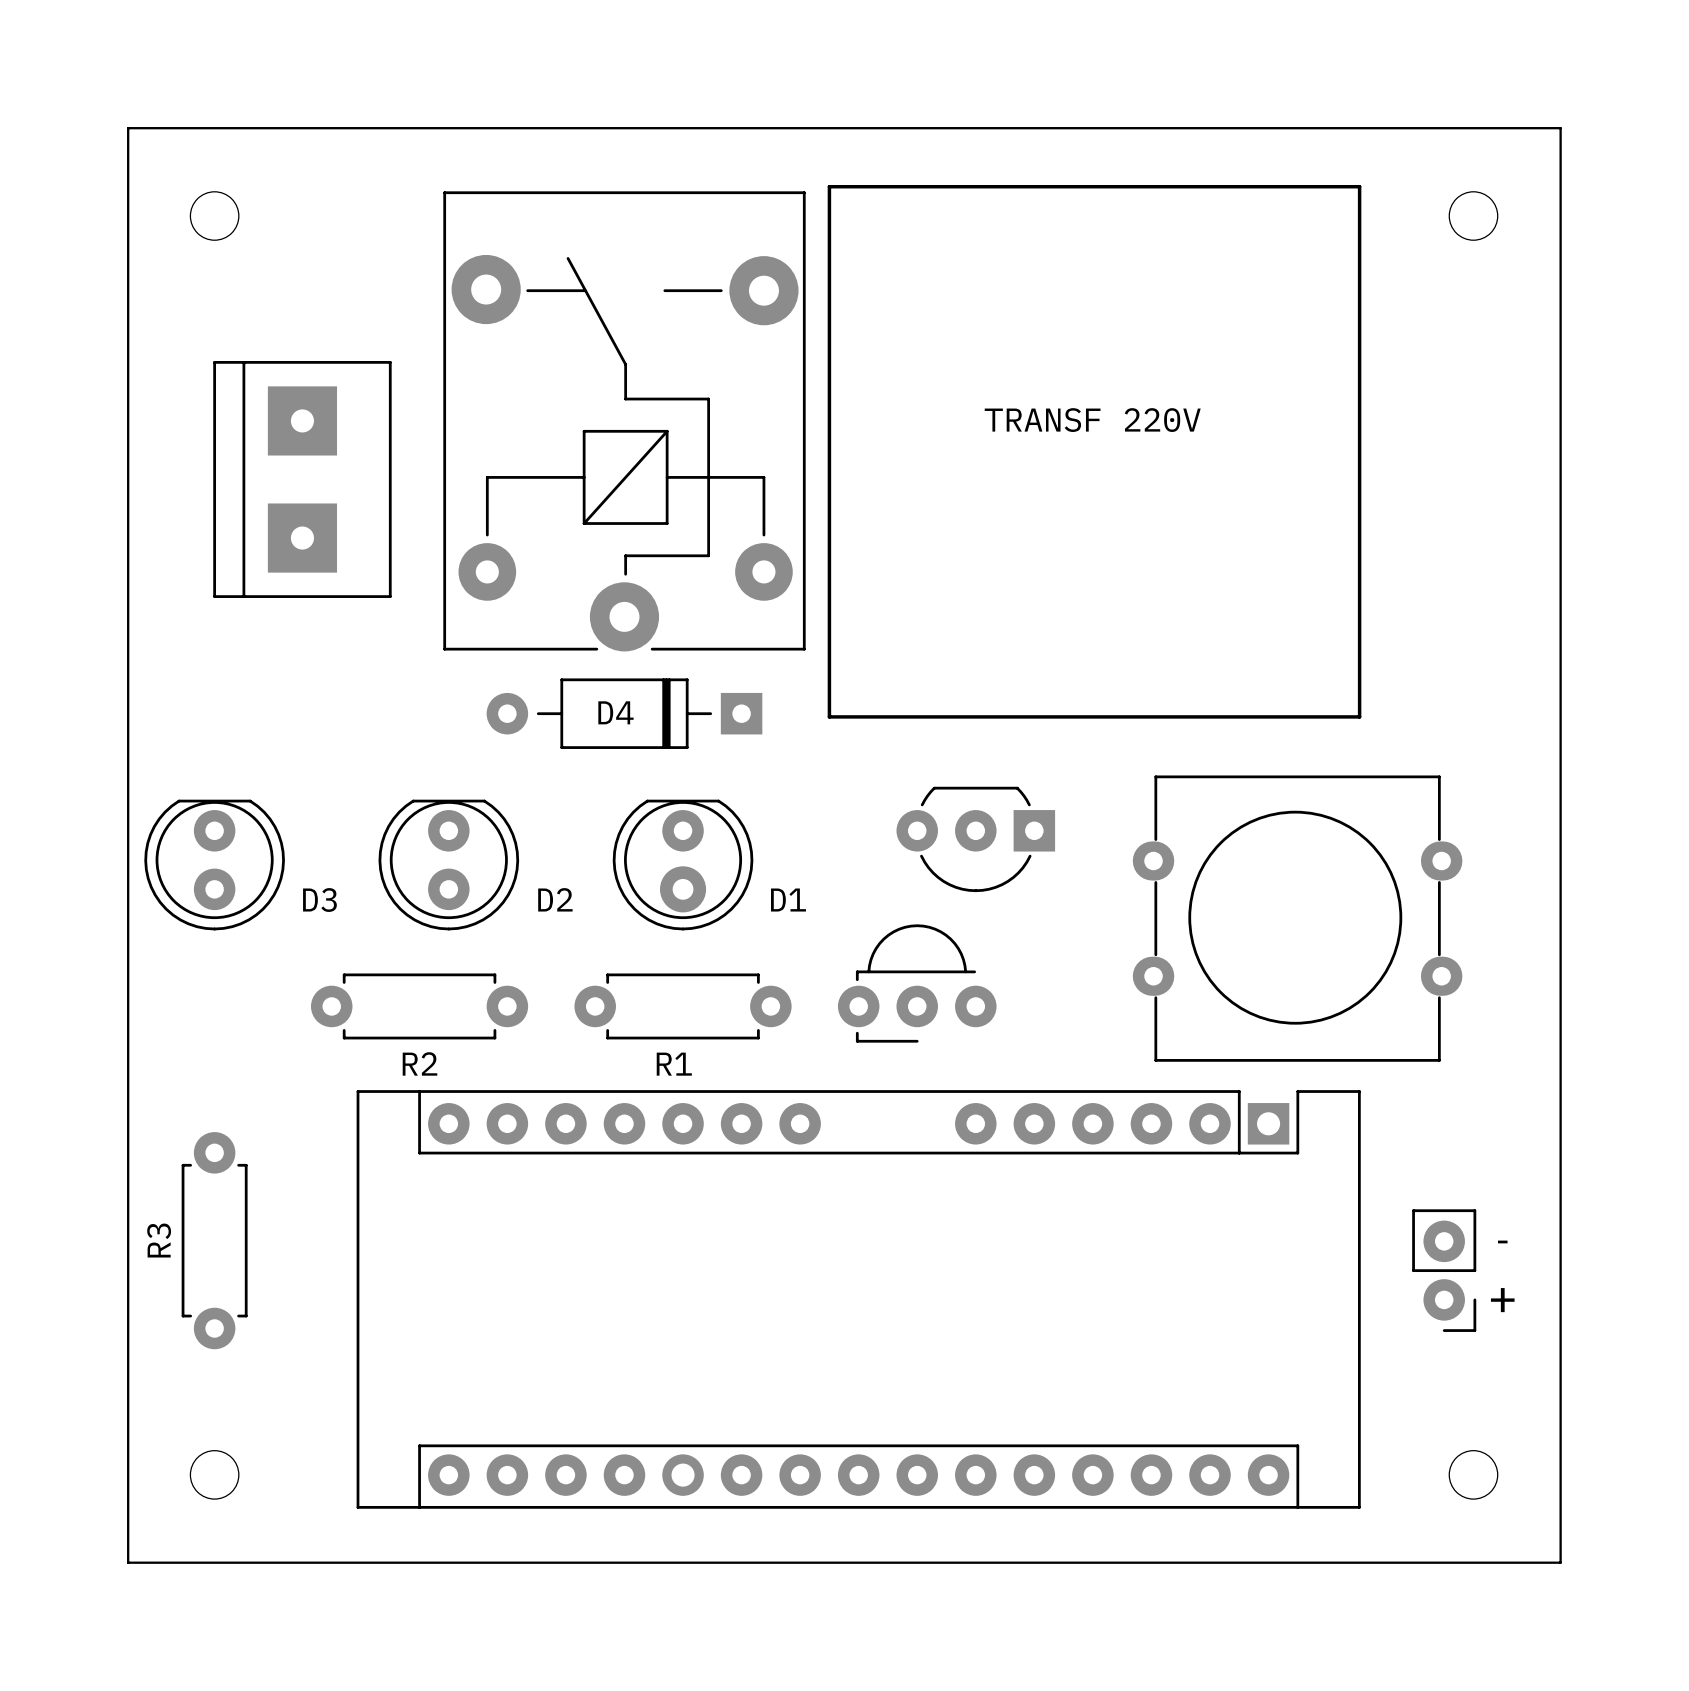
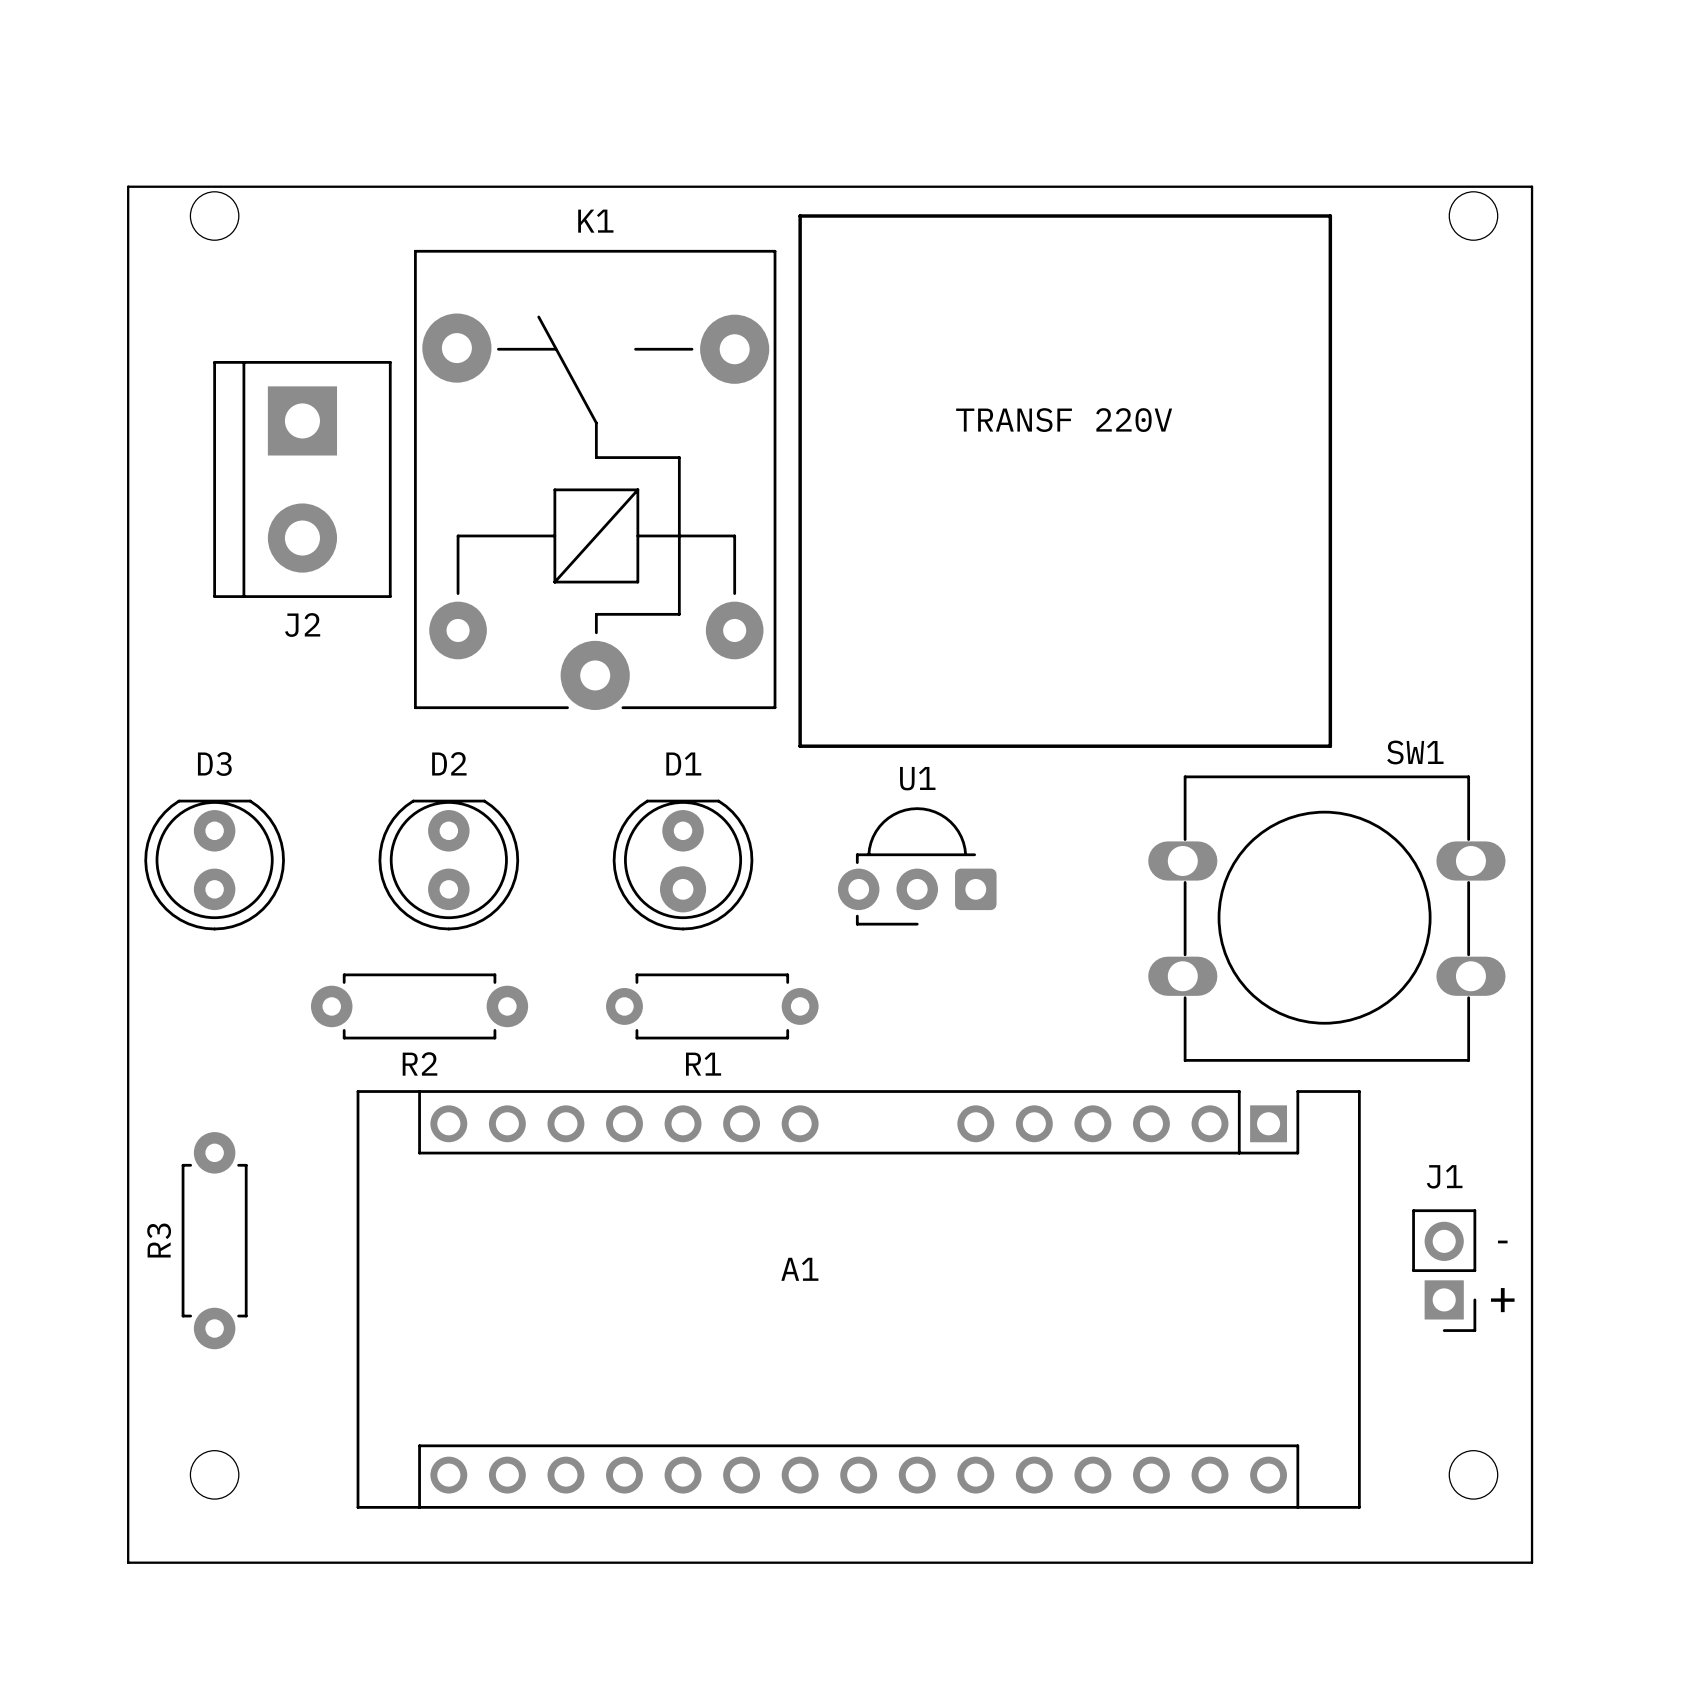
board edge: (128, 186) (128, 128) (1560, 128) (1560, 1562) (1532, 1562) -> (128, 186) (1532, 186) (1532, 1562)
line: (829, 186) (1359, 186) (1359, 716) (829, 716) (829, 186) -> (800, 216) (1330, 216) (1330, 746) (800, 746) (800, 216)
text position: TRANSF 220V (1092, 420) -> TRANSF 220V (1064, 420)
part: (624, 421) -> none
part: (302, 479) -> none
J2: none -> (302, 479)
K1: none -> (595, 479)
D4: (624, 713) -> none
part: (975, 839) -> none
U1: none -> (917, 866)
D2 name position: D2 (555, 899) -> D2 (449, 763)
D3 name position: D3 (319, 900) -> D3 (214, 764)
D1 name position: D1 (788, 900) -> D1 (683, 764)
part: (1297, 918) -> none
SW1: none -> (1326, 918)
R1 footprint: [574, 973, 792, 1040] -> [606, 973, 819, 1040]
part: (917, 983) -> none
part: (1444, 1270) -> none
J1: none -> (1444, 1270)
part: (858, 1299) -> none
A1: none -> (858, 1299)

